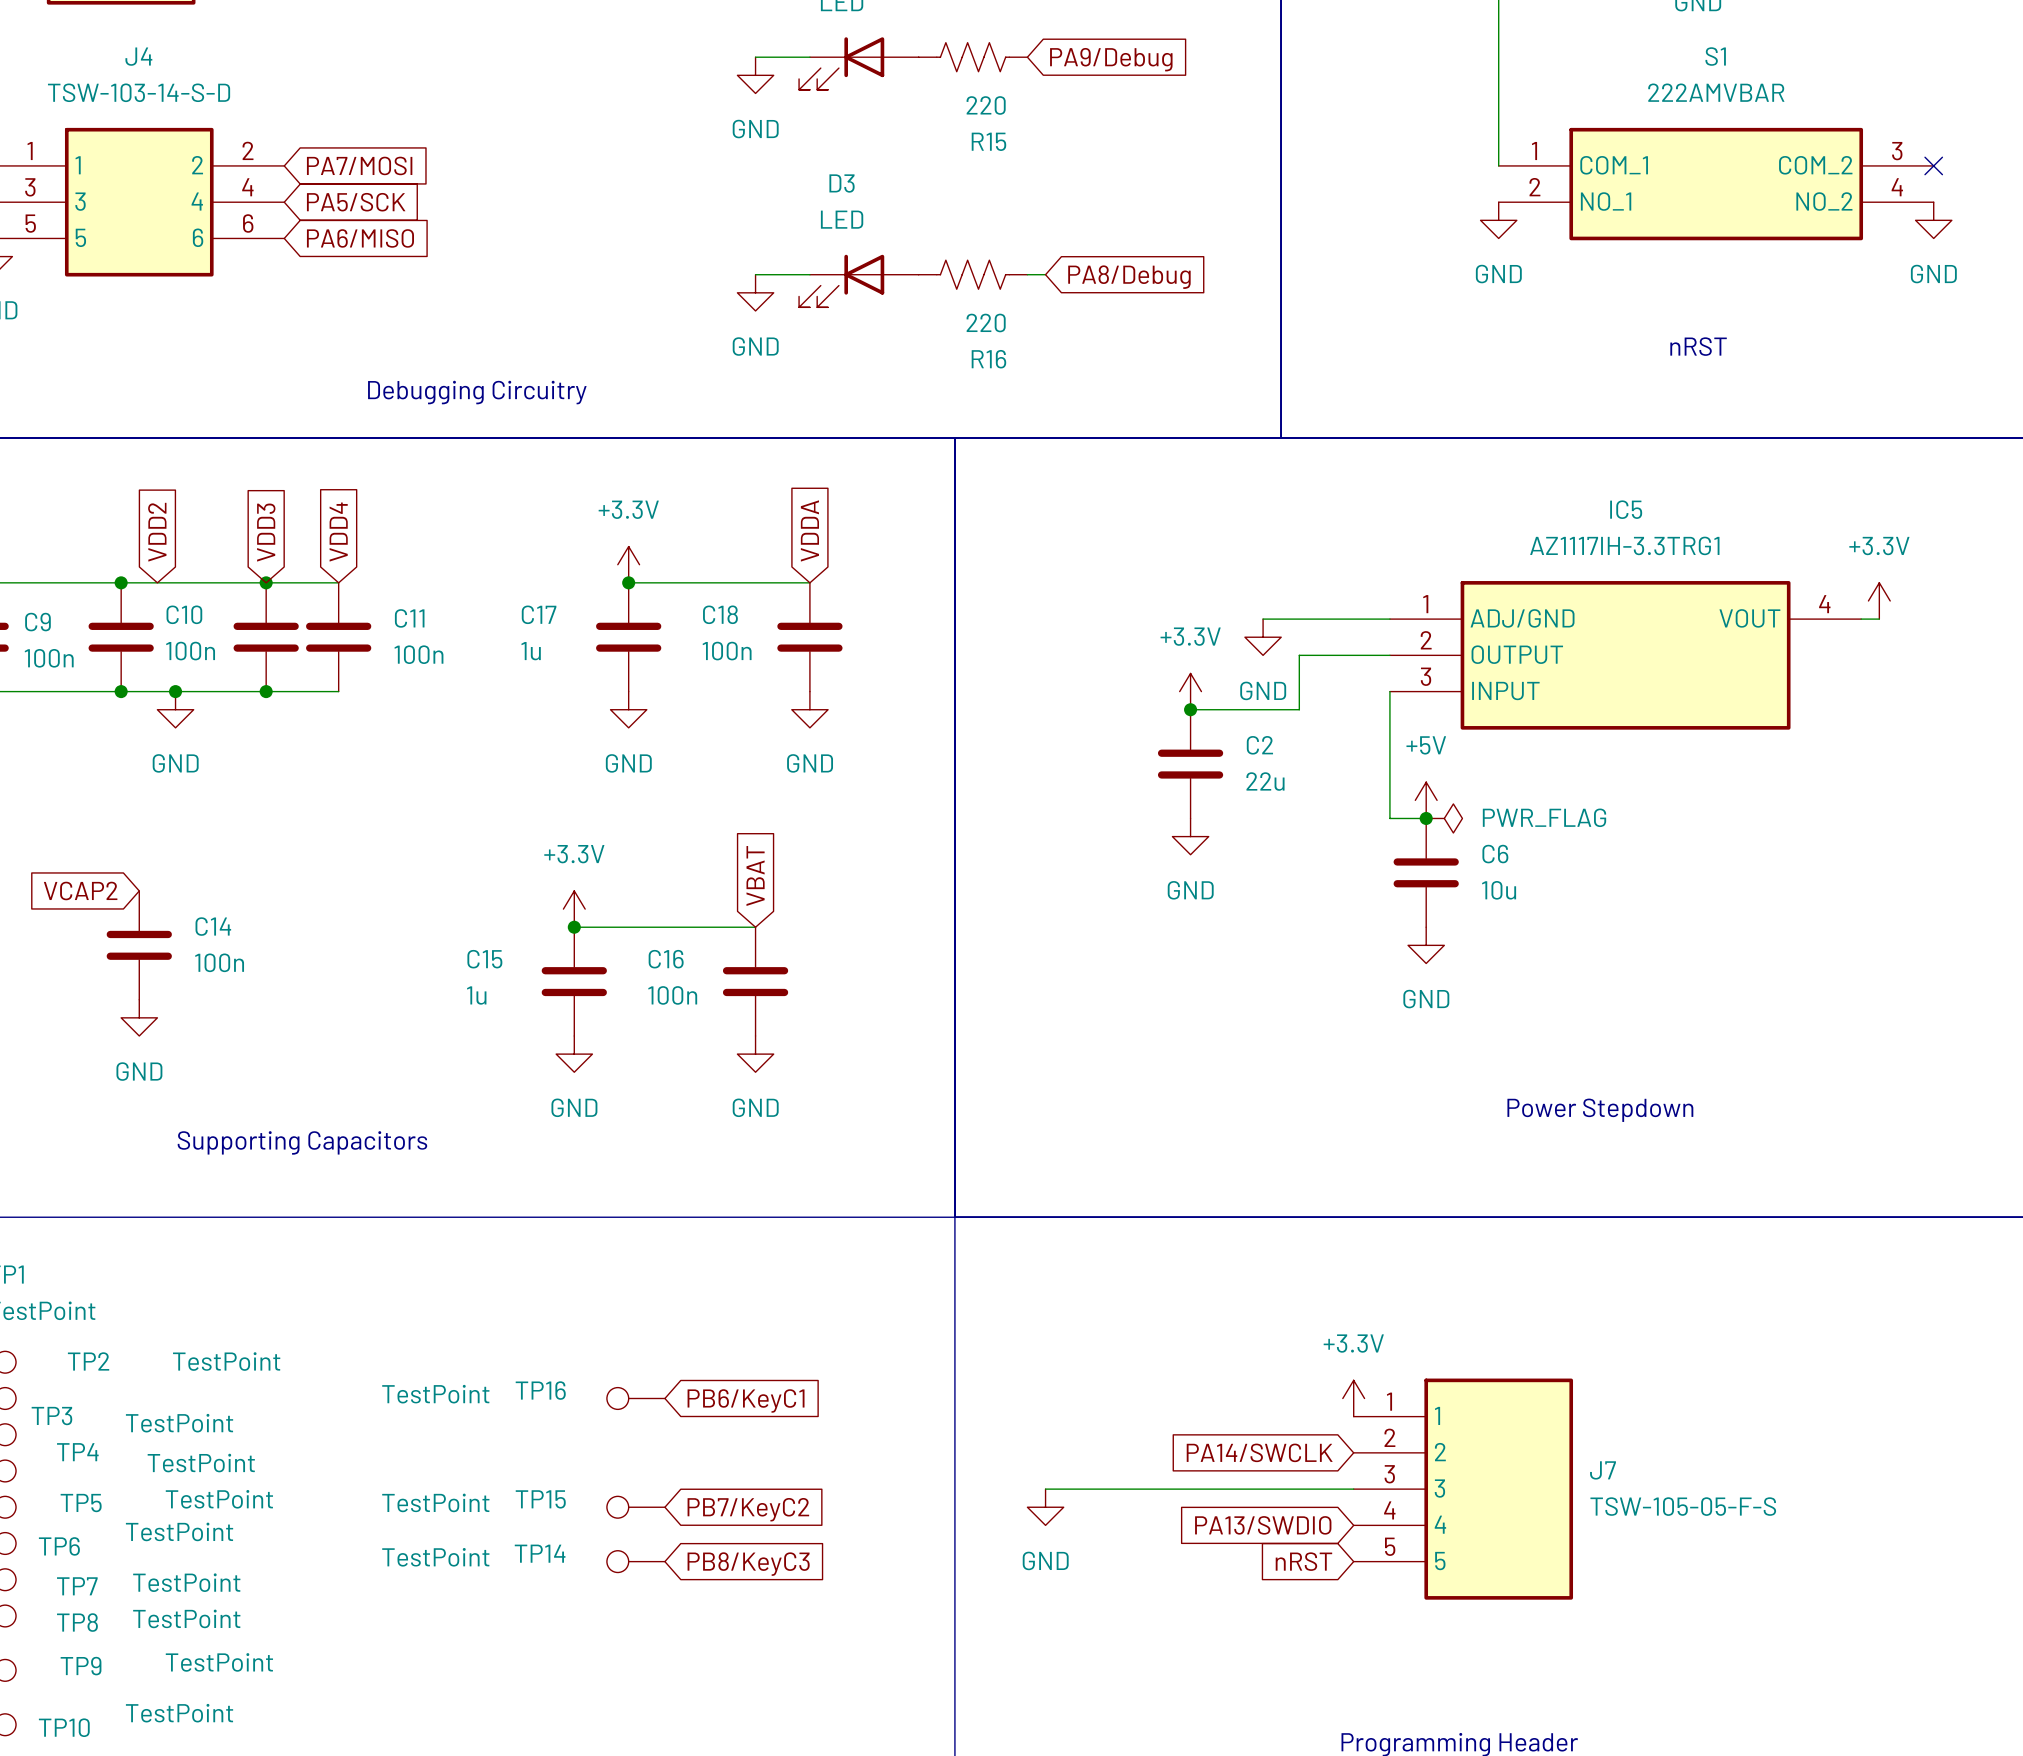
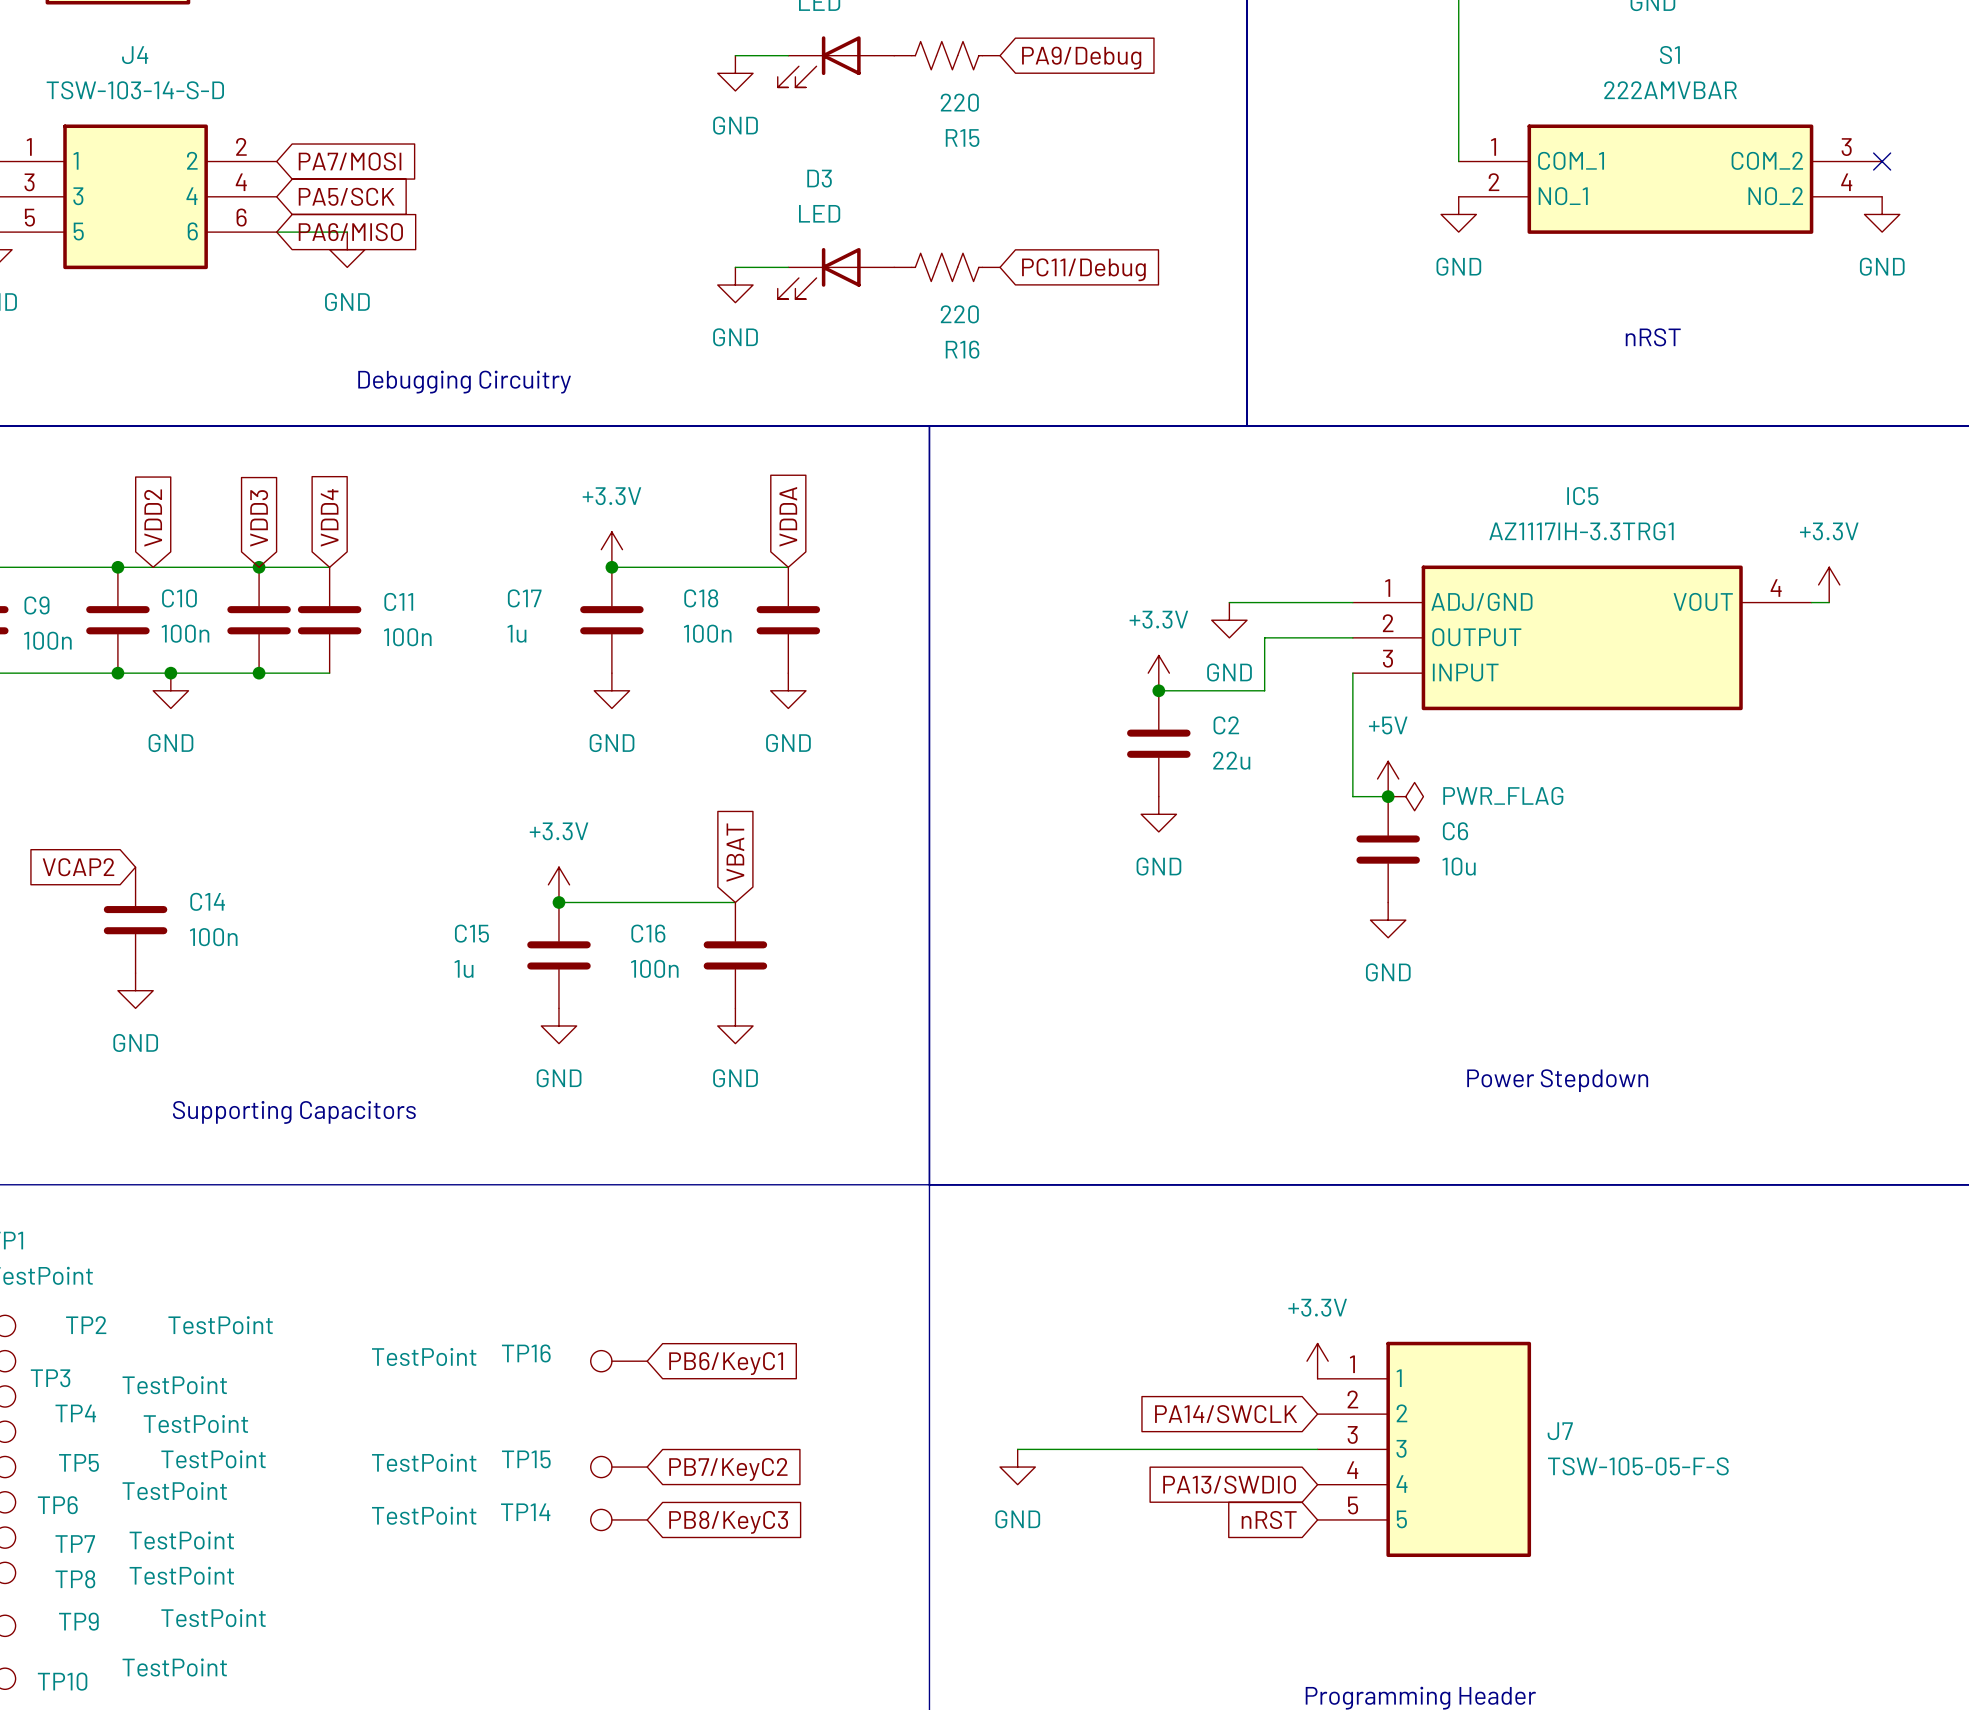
wire: none -> (276, 232) (347, 232)
power symbol: none -> GND (347, 249)
wire: (1027, 274) (1045, 274) -> none
global label: PA8/Debug (1129, 277) -> PC11/Debug (1083, 269)

